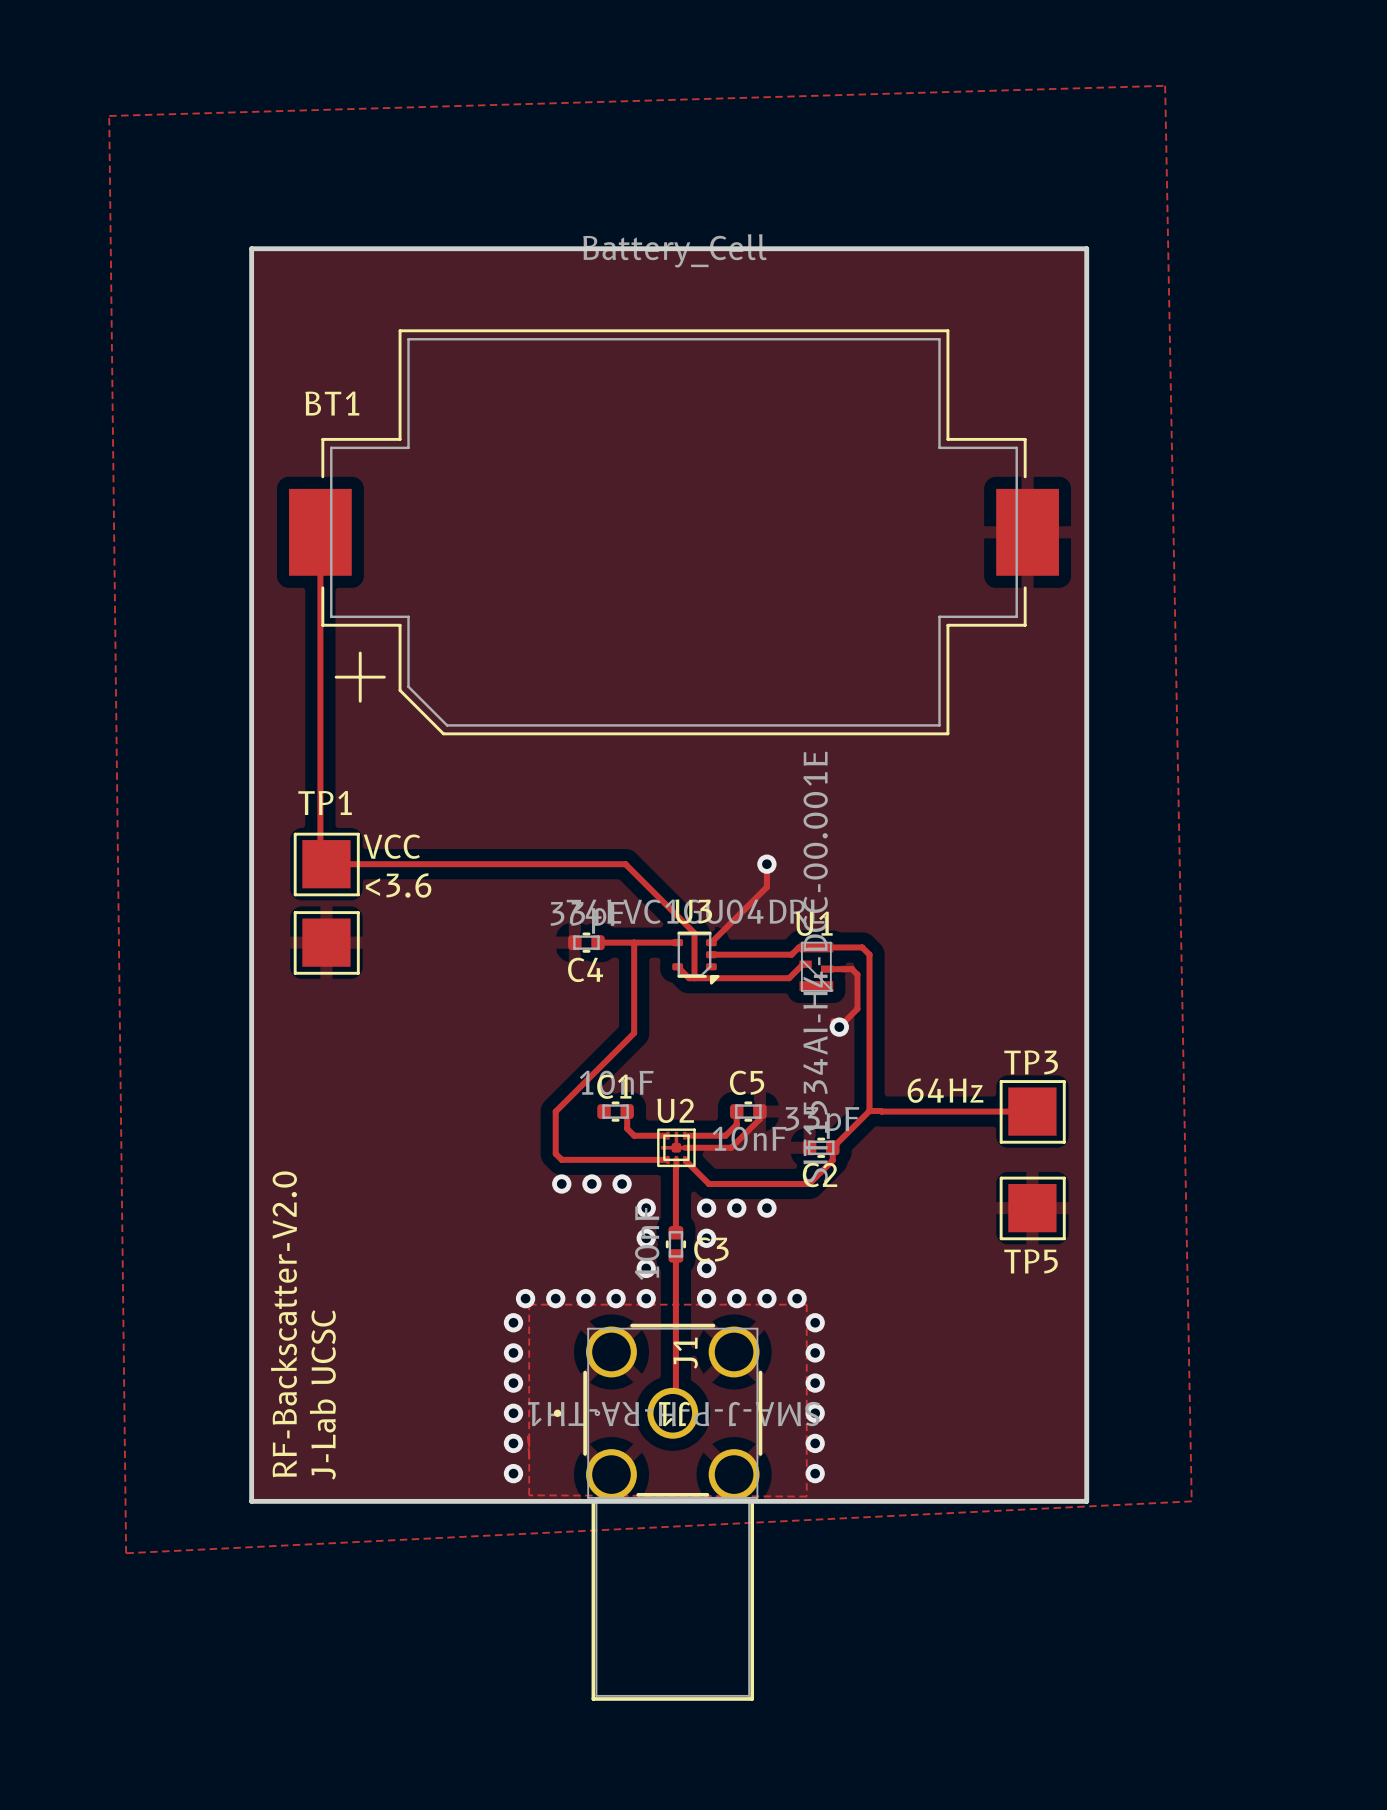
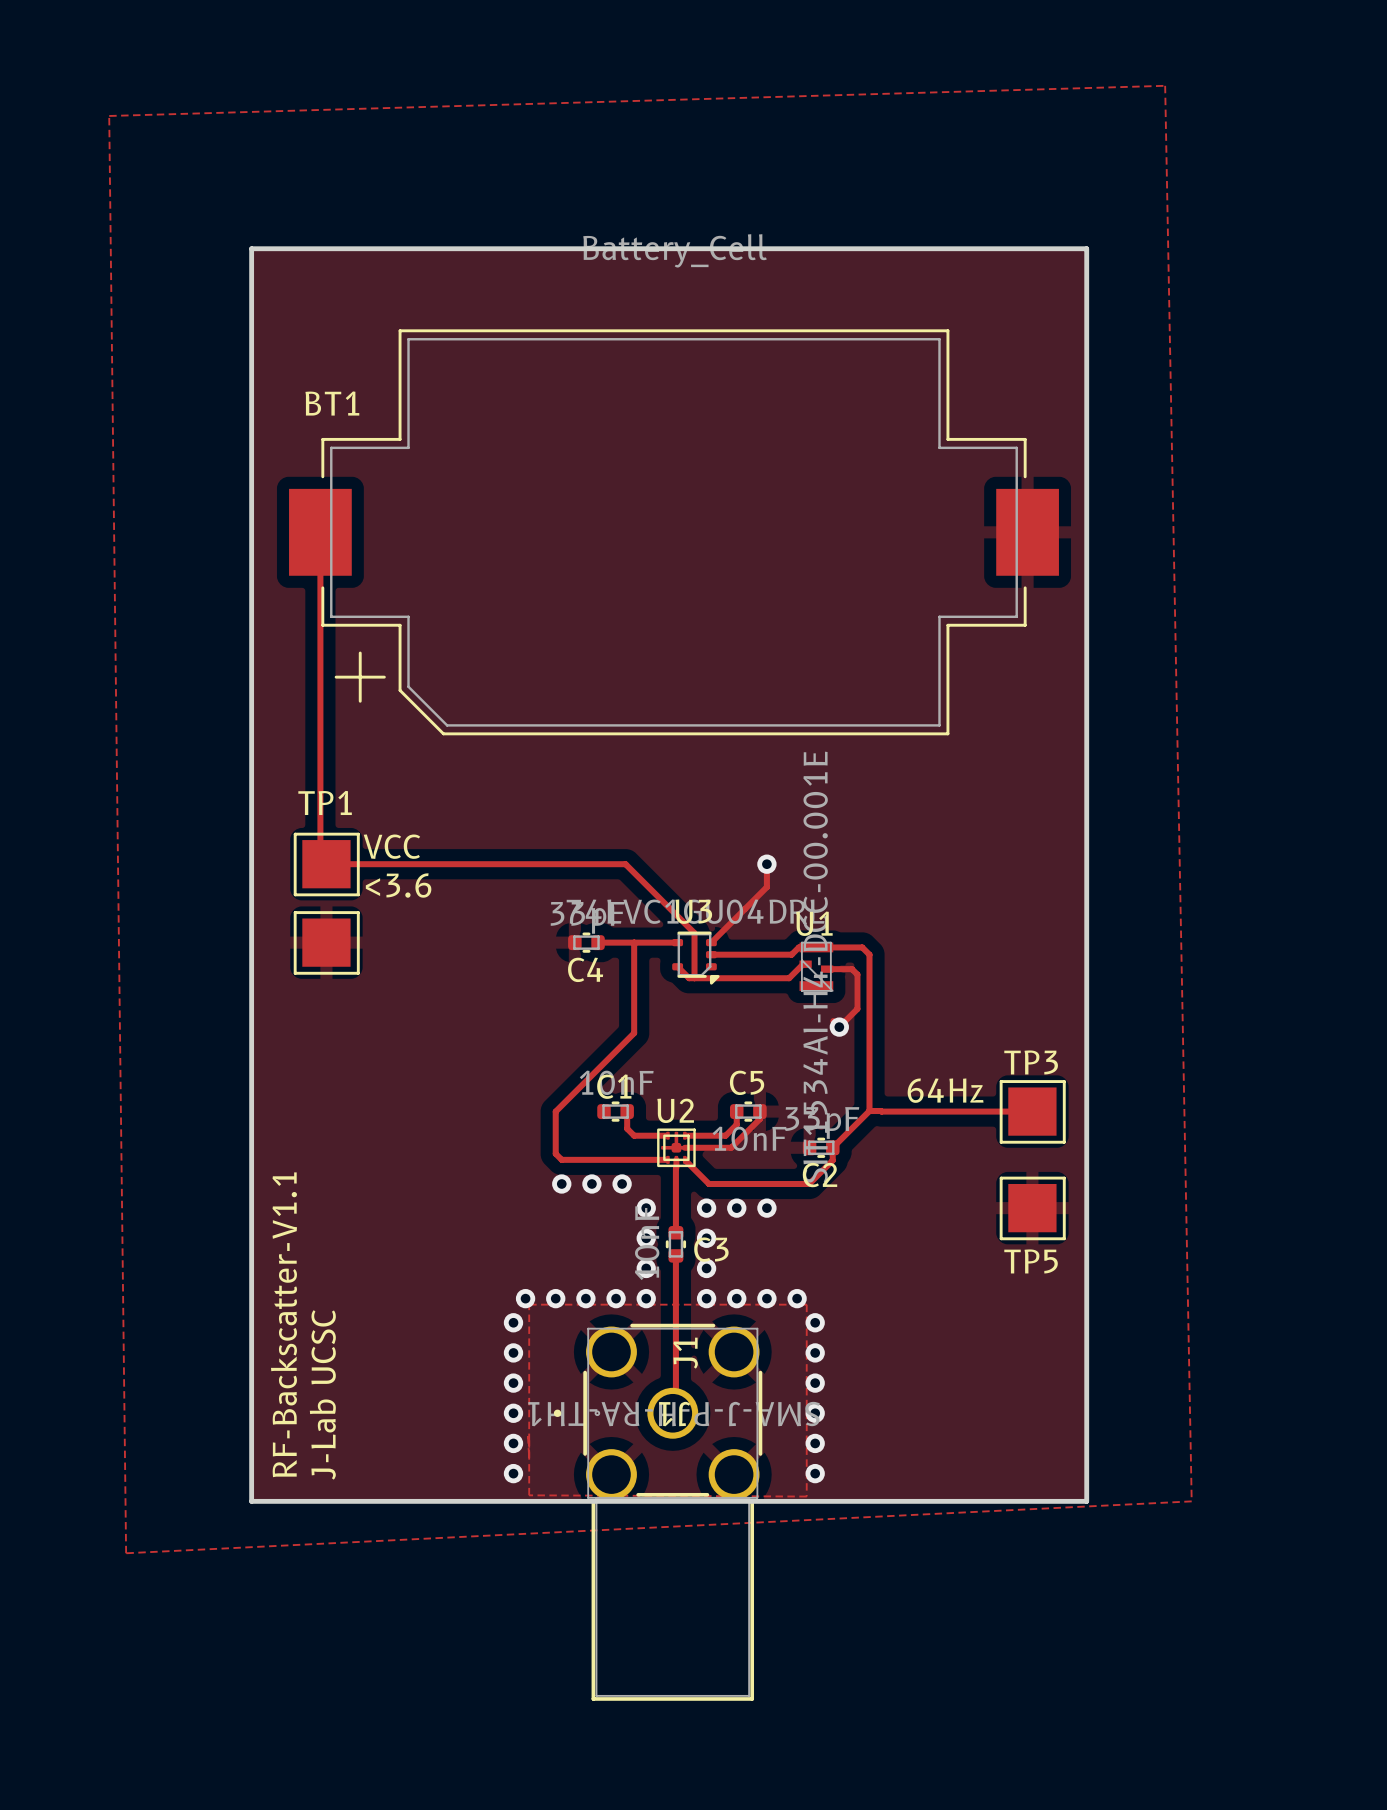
text: RF-Backscatter-V2.0 (283, 1324) -> RF-Backscatter-V1.1 (283, 1324)

